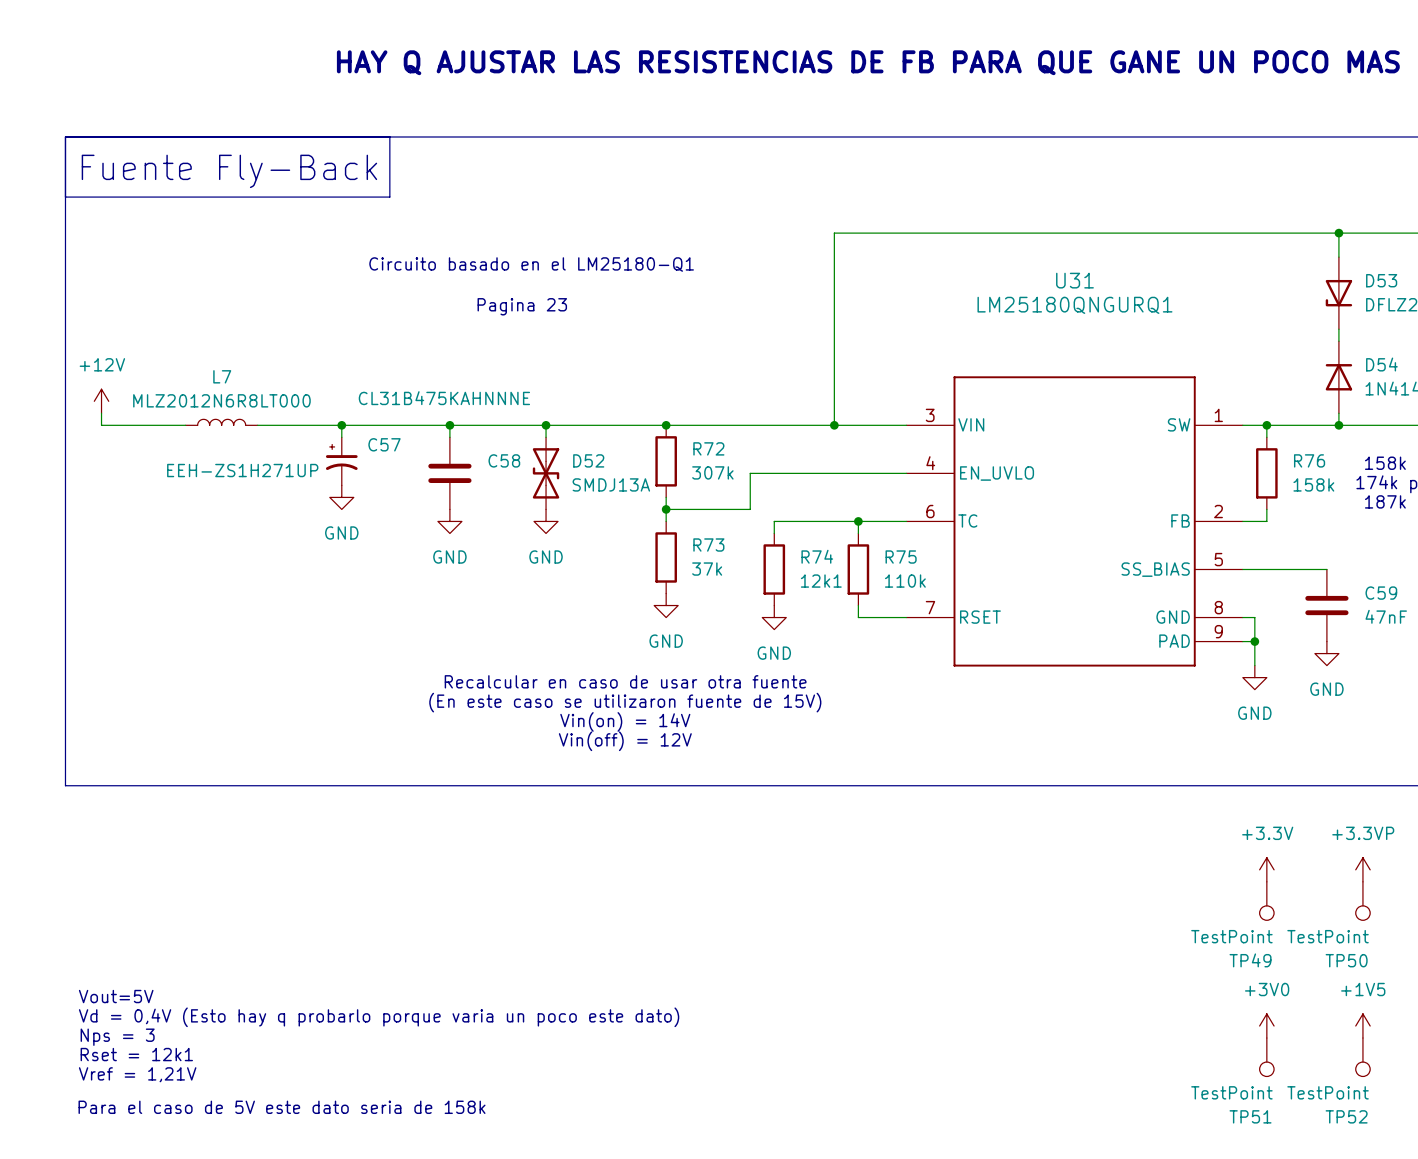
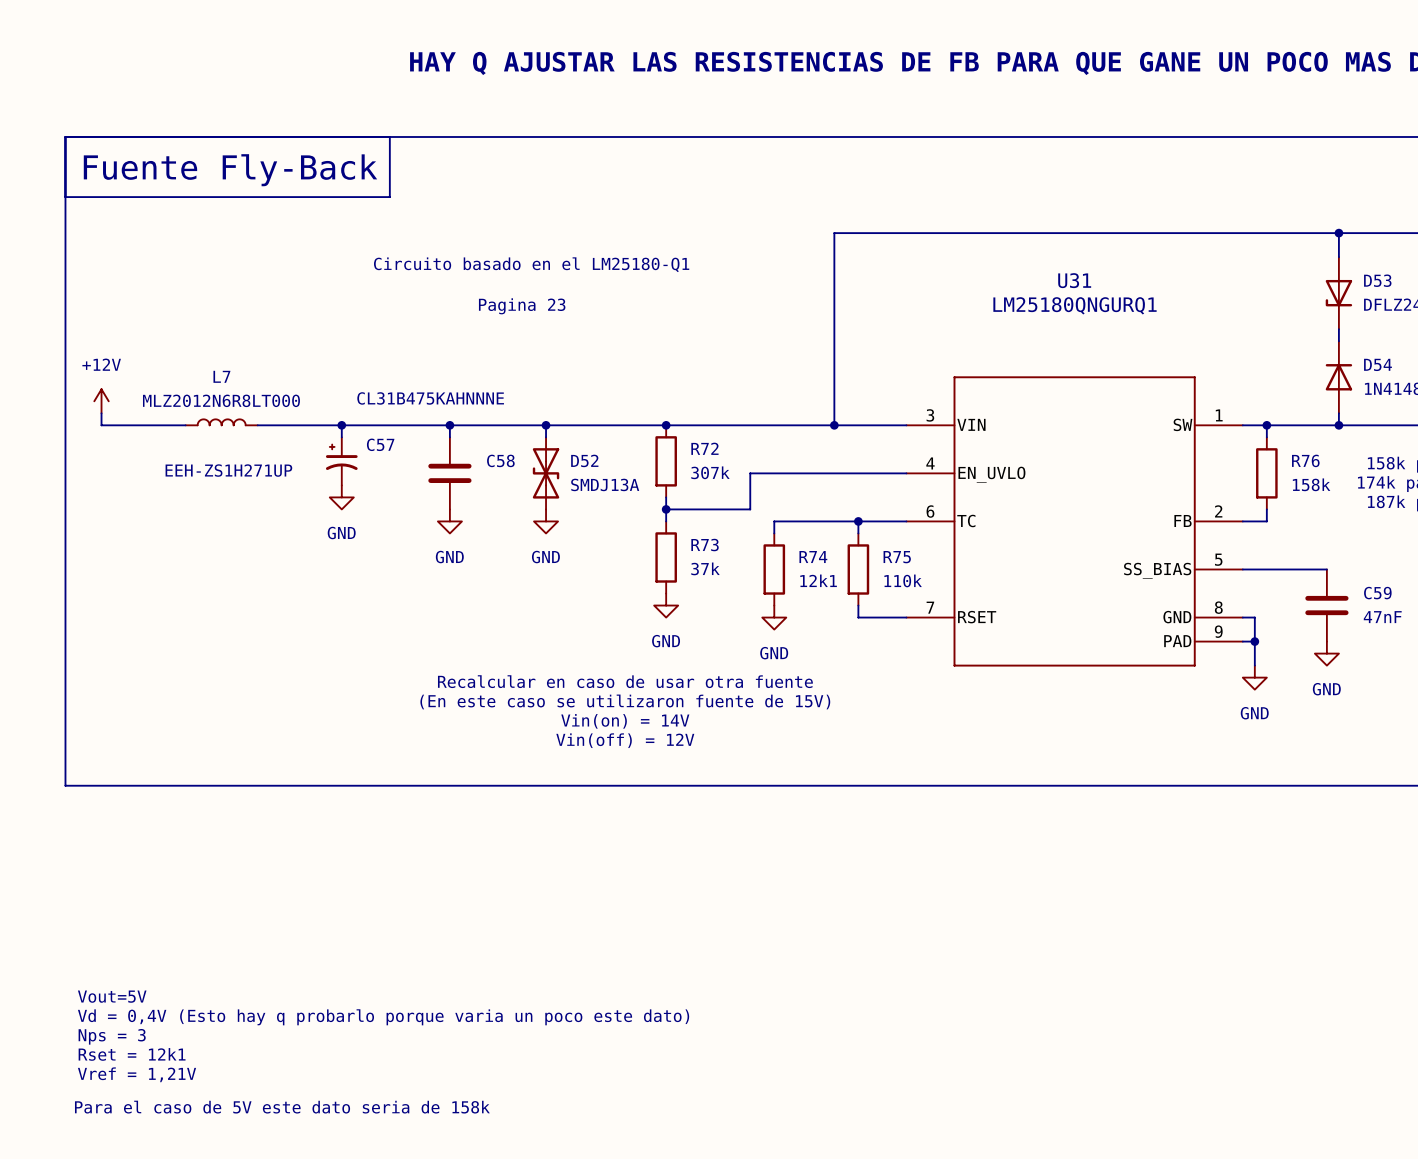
power symbol: +3.3V (1266, 869) -> none
power symbol: +3.3VP (1362, 869) -> none
TP49: TestPoint (1266, 901) -> none
TP50: TestPoint (1362, 901) -> none
power symbol: +3V0 (1266, 1026) -> none
power symbol: +1V5 (1362, 1026) -> none
TP51: TestPoint (1266, 1057) -> none
TP52: TestPoint (1362, 1057) -> none

